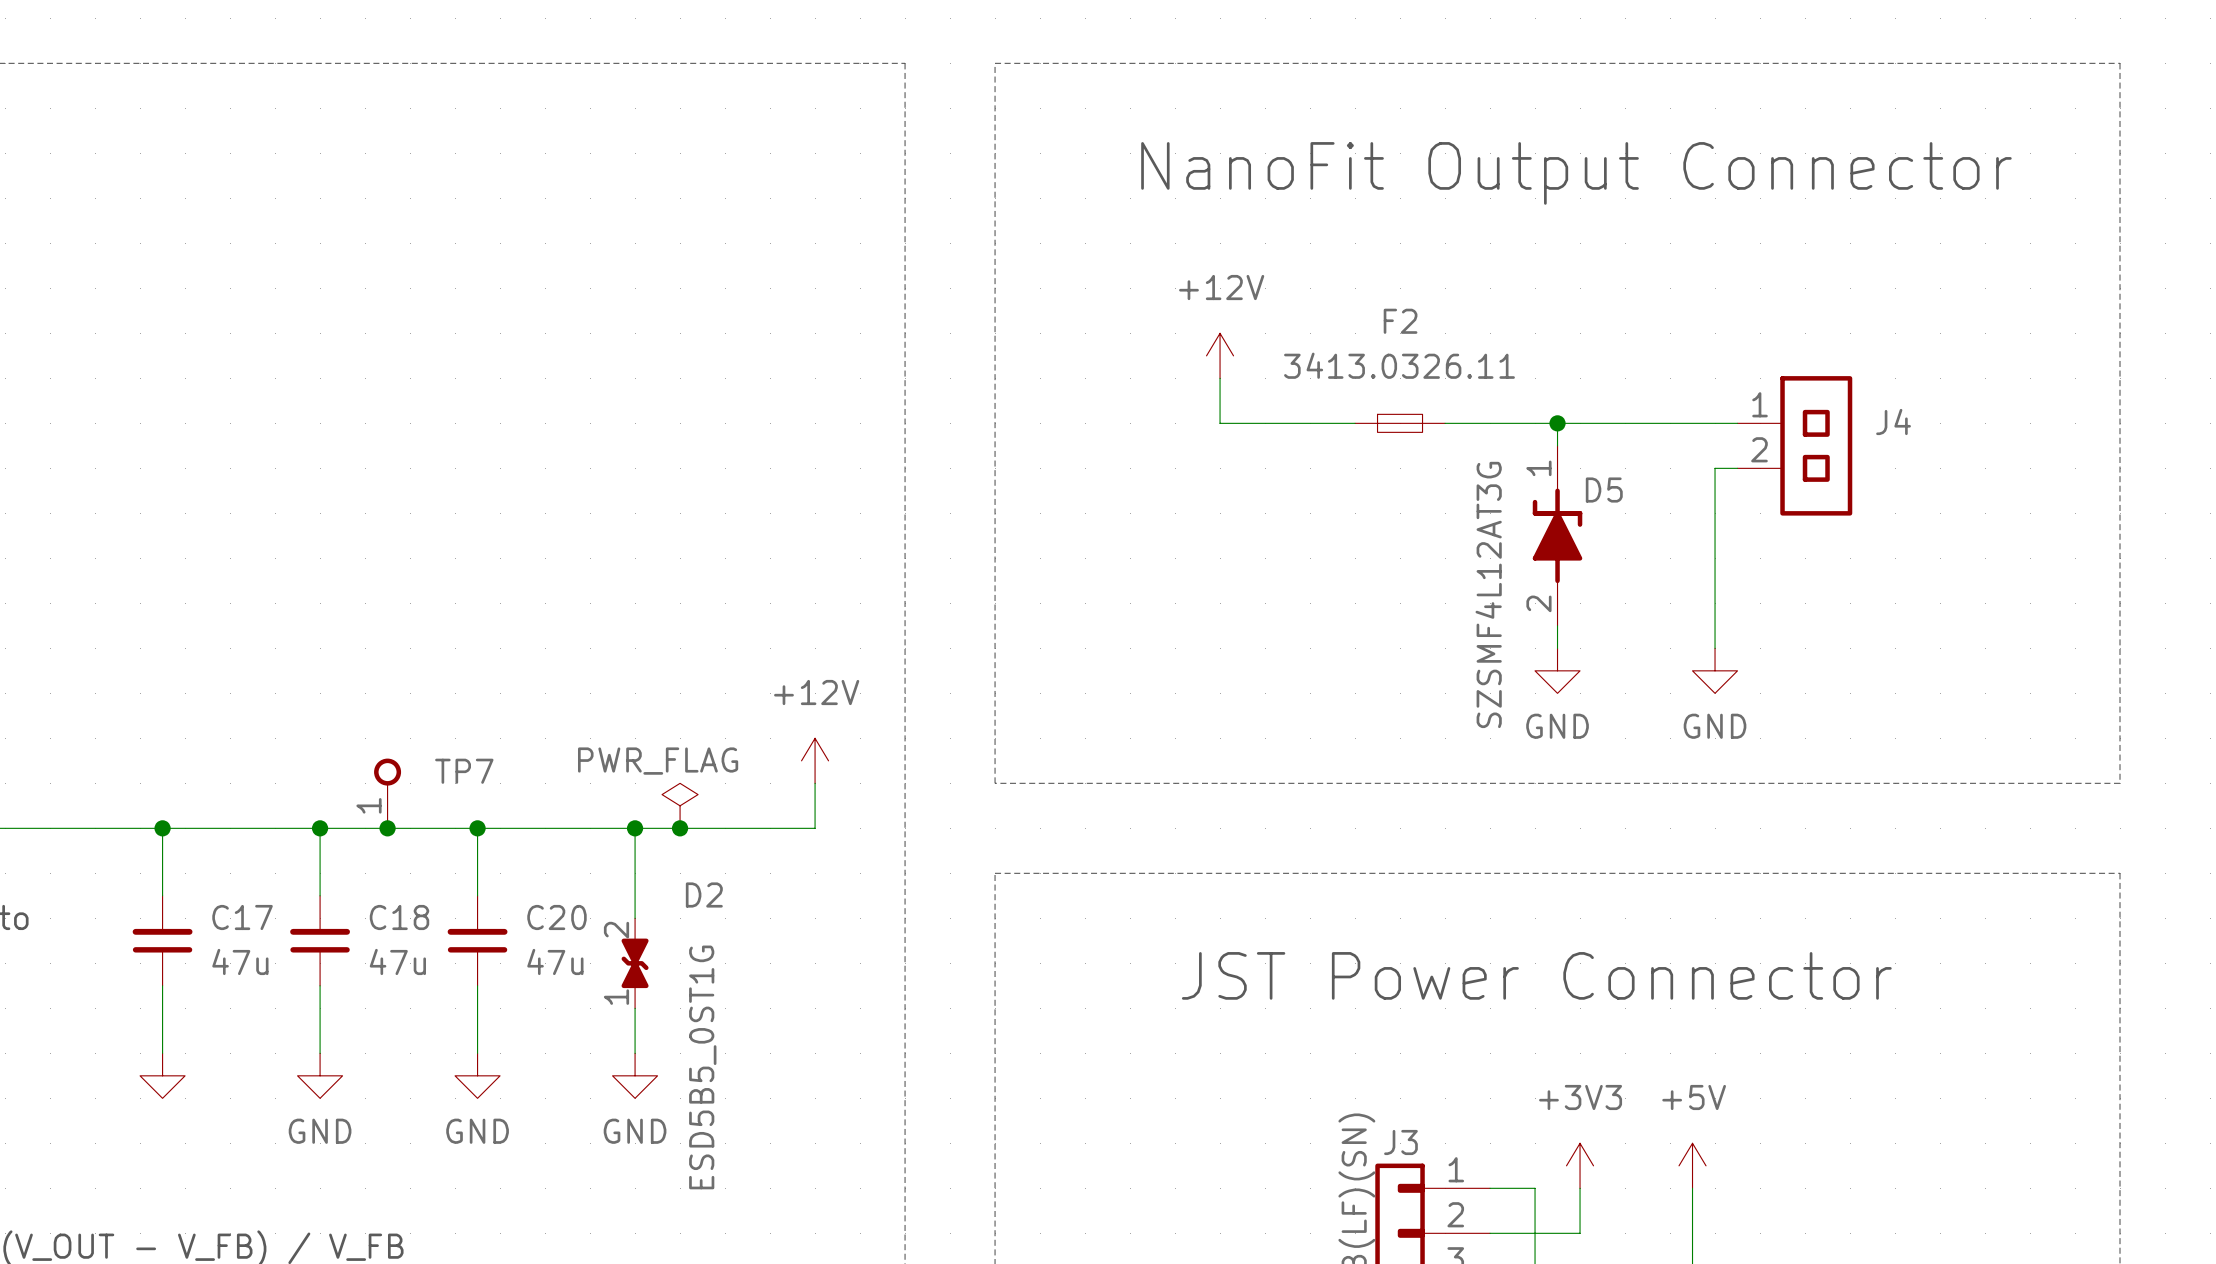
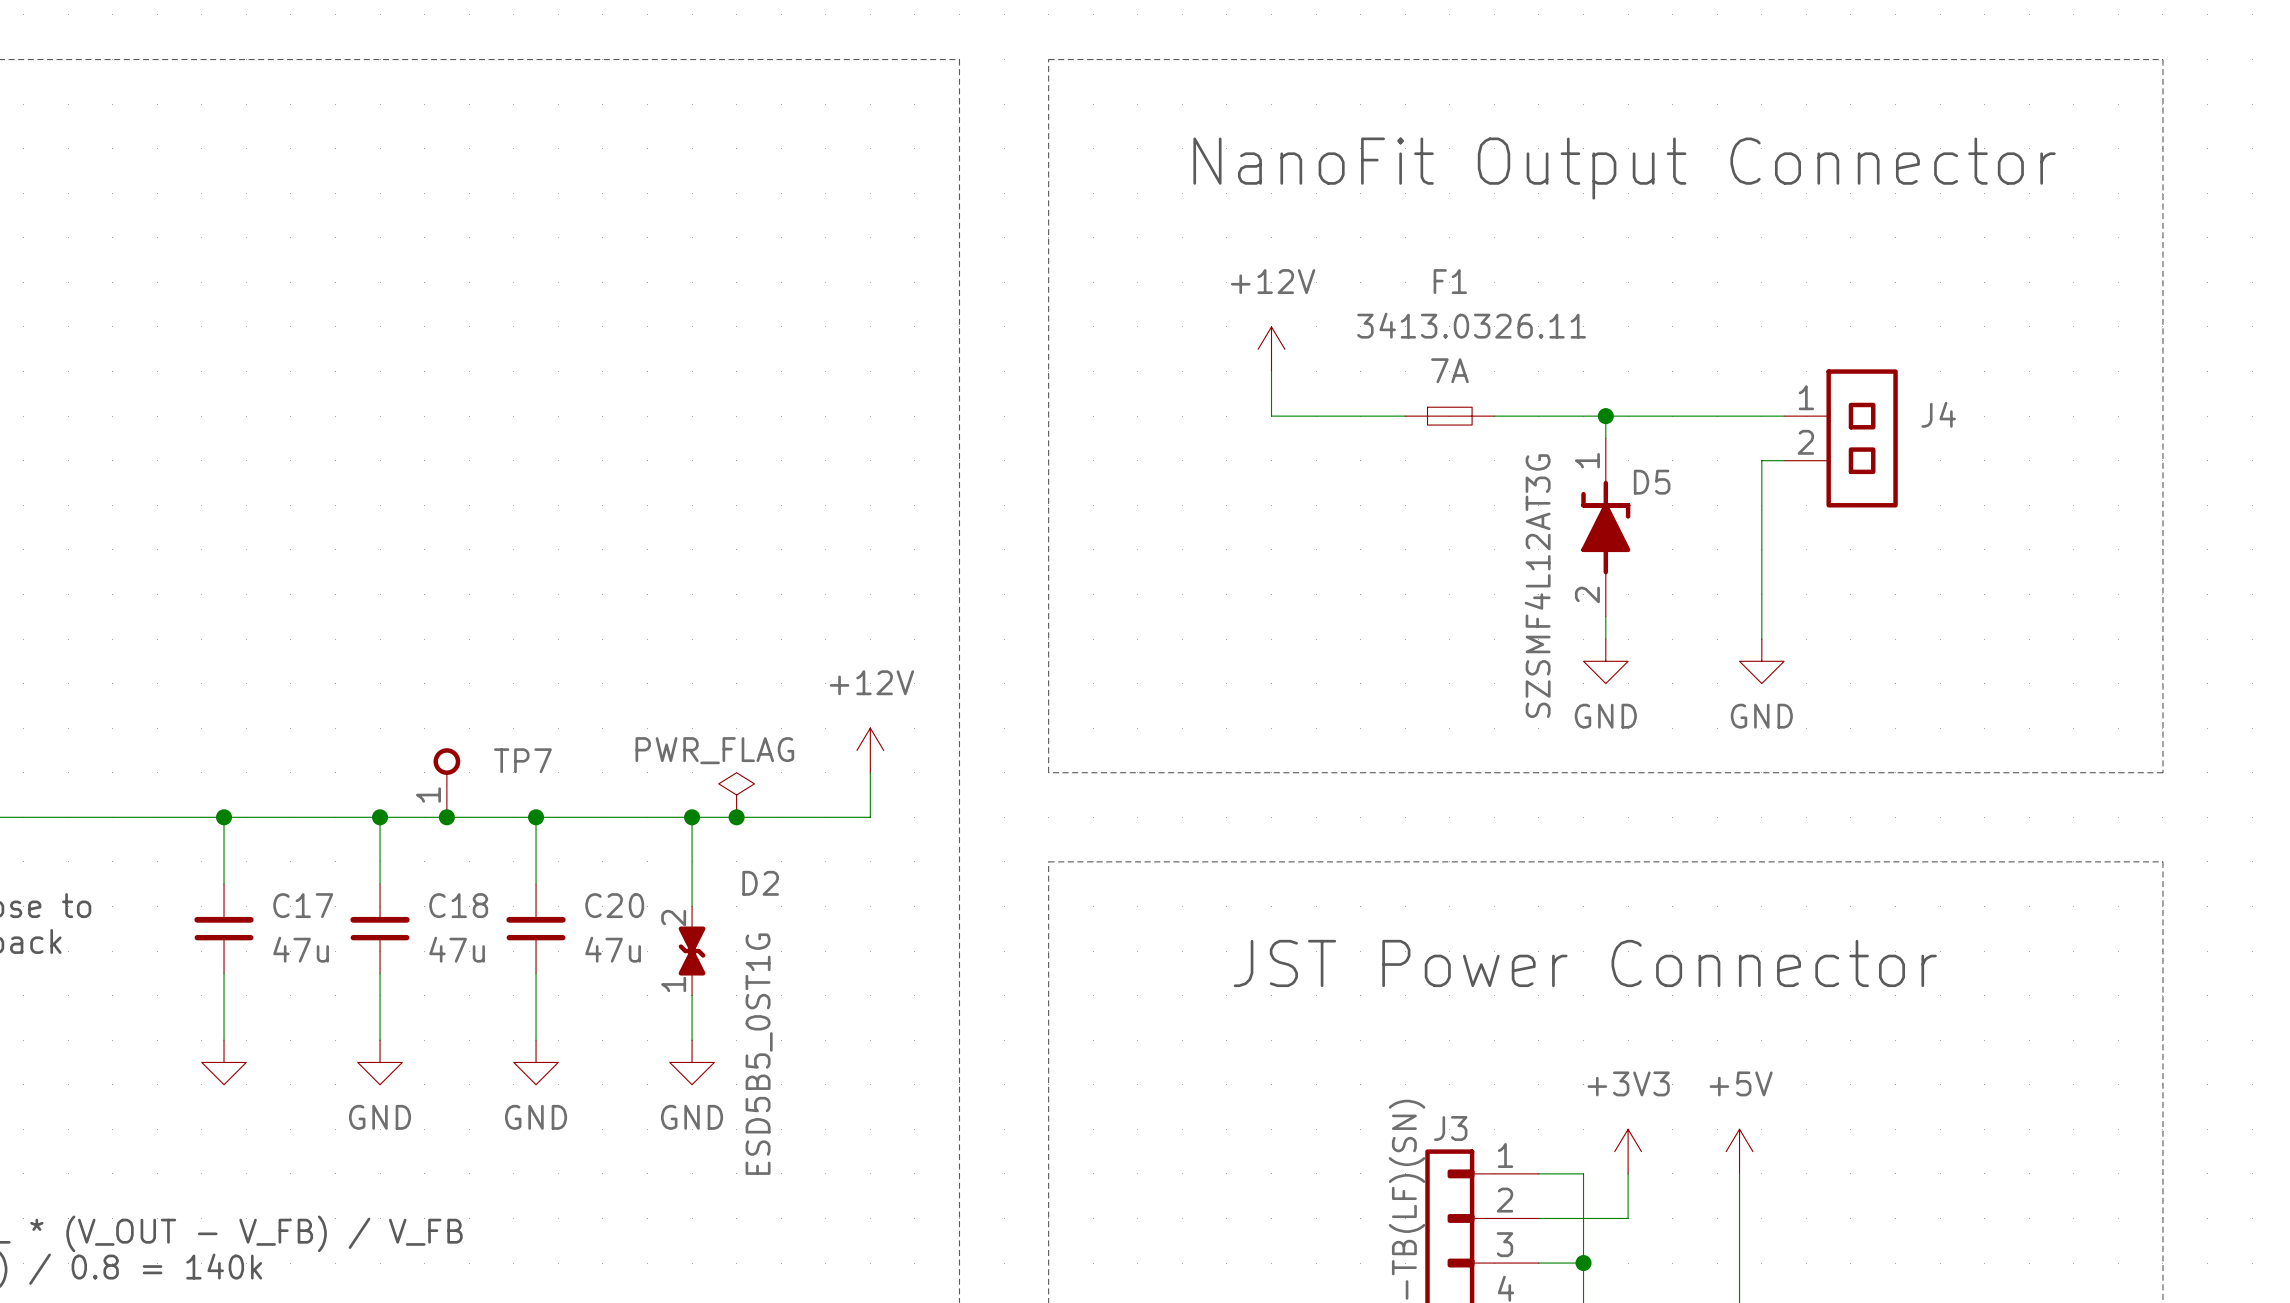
F2 name: F2 (1400, 321) -> F1 (1450, 281)
F2 text position: 3413.0326.11 (1399, 365) -> 3413.0326.11 (1471, 325)
F2 text: none -> 7A (1449, 370)

